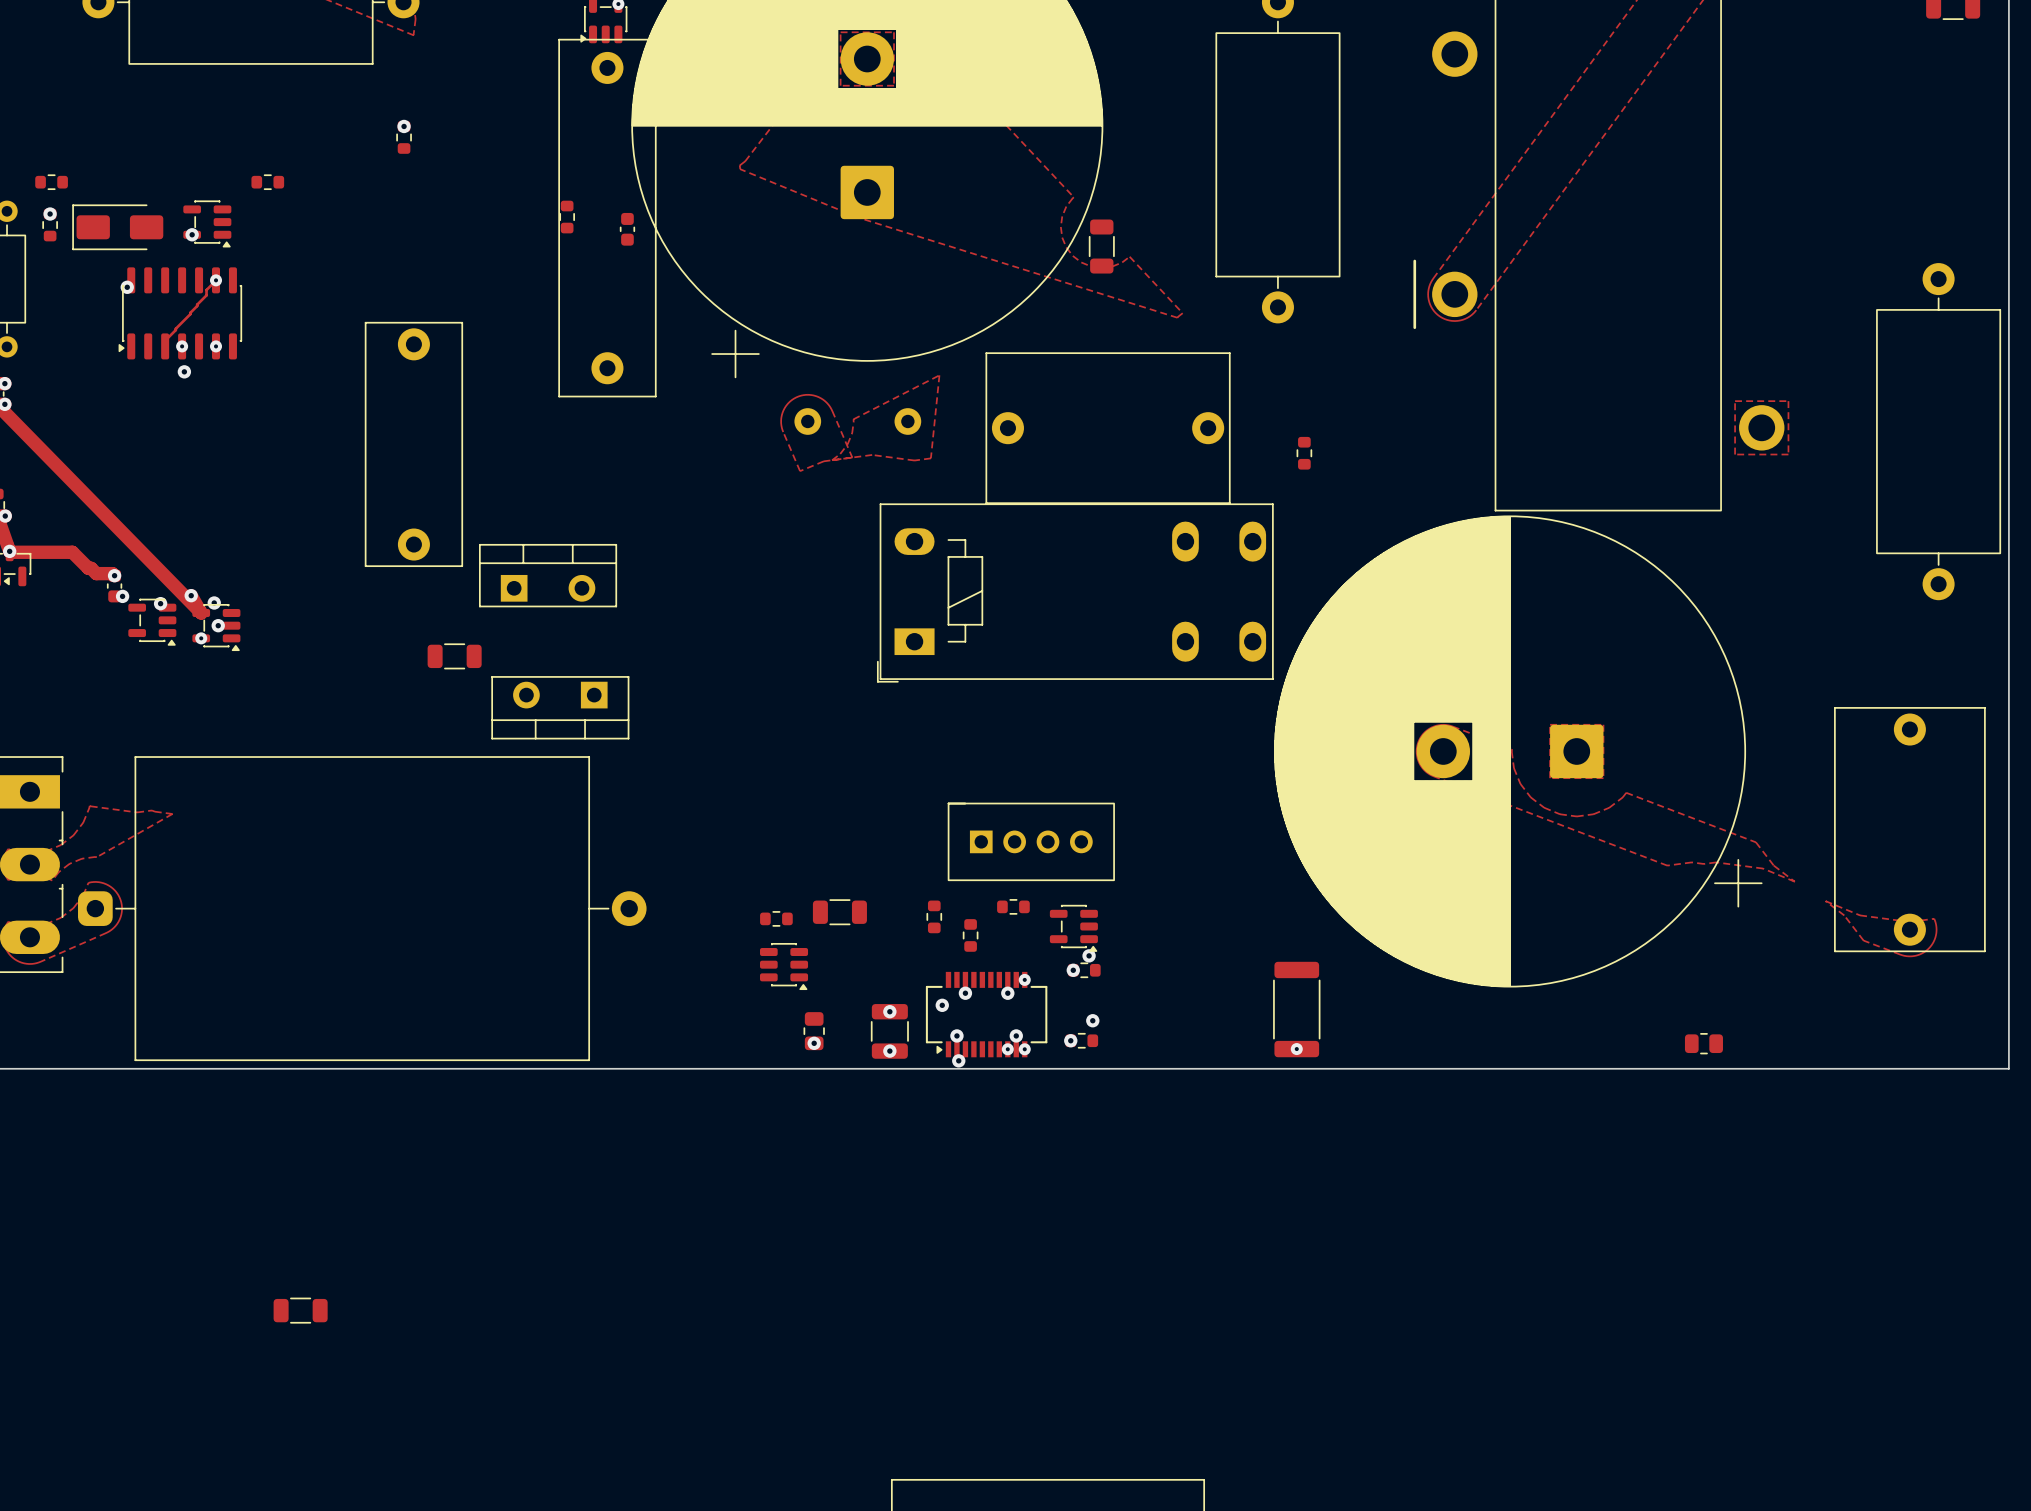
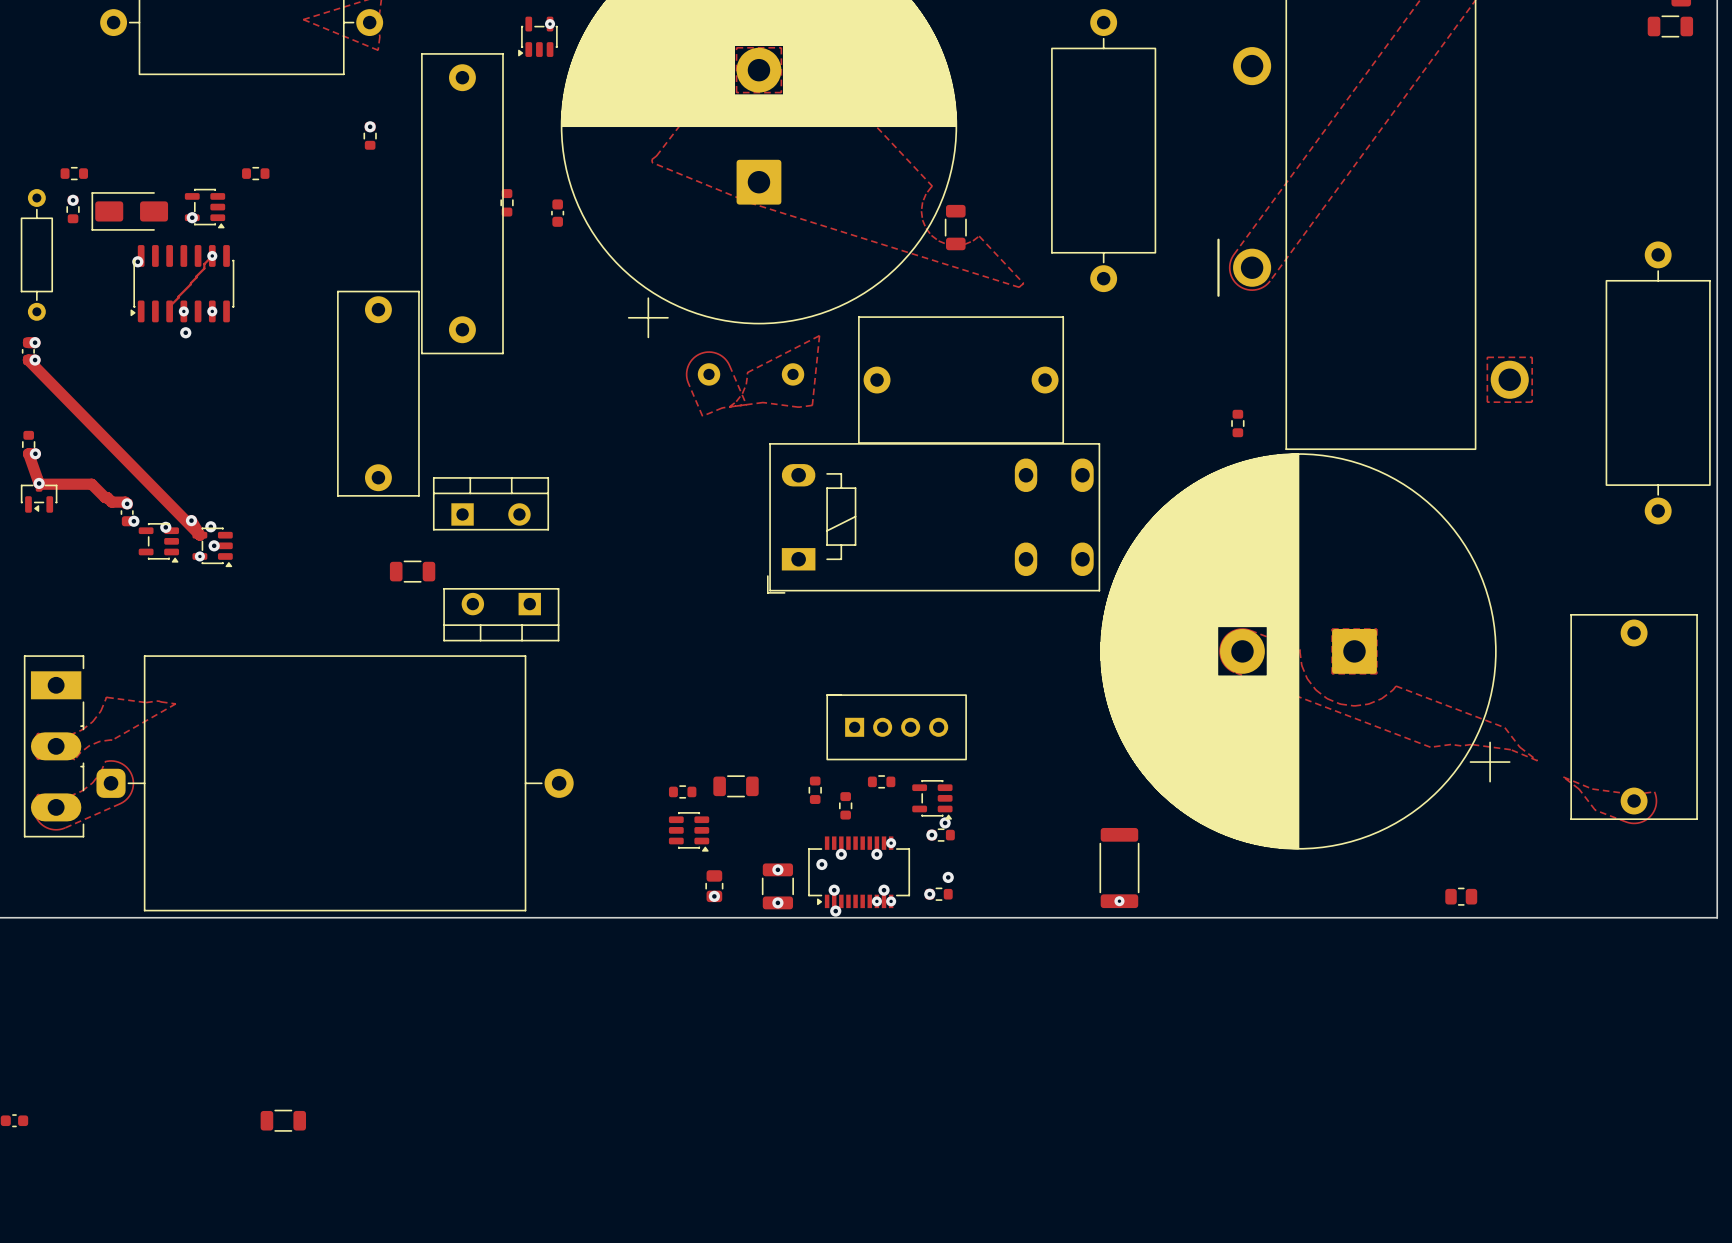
part position: (607, 218) -> (462, 203)
part position: (1304, 453) -> (1237, 423)

